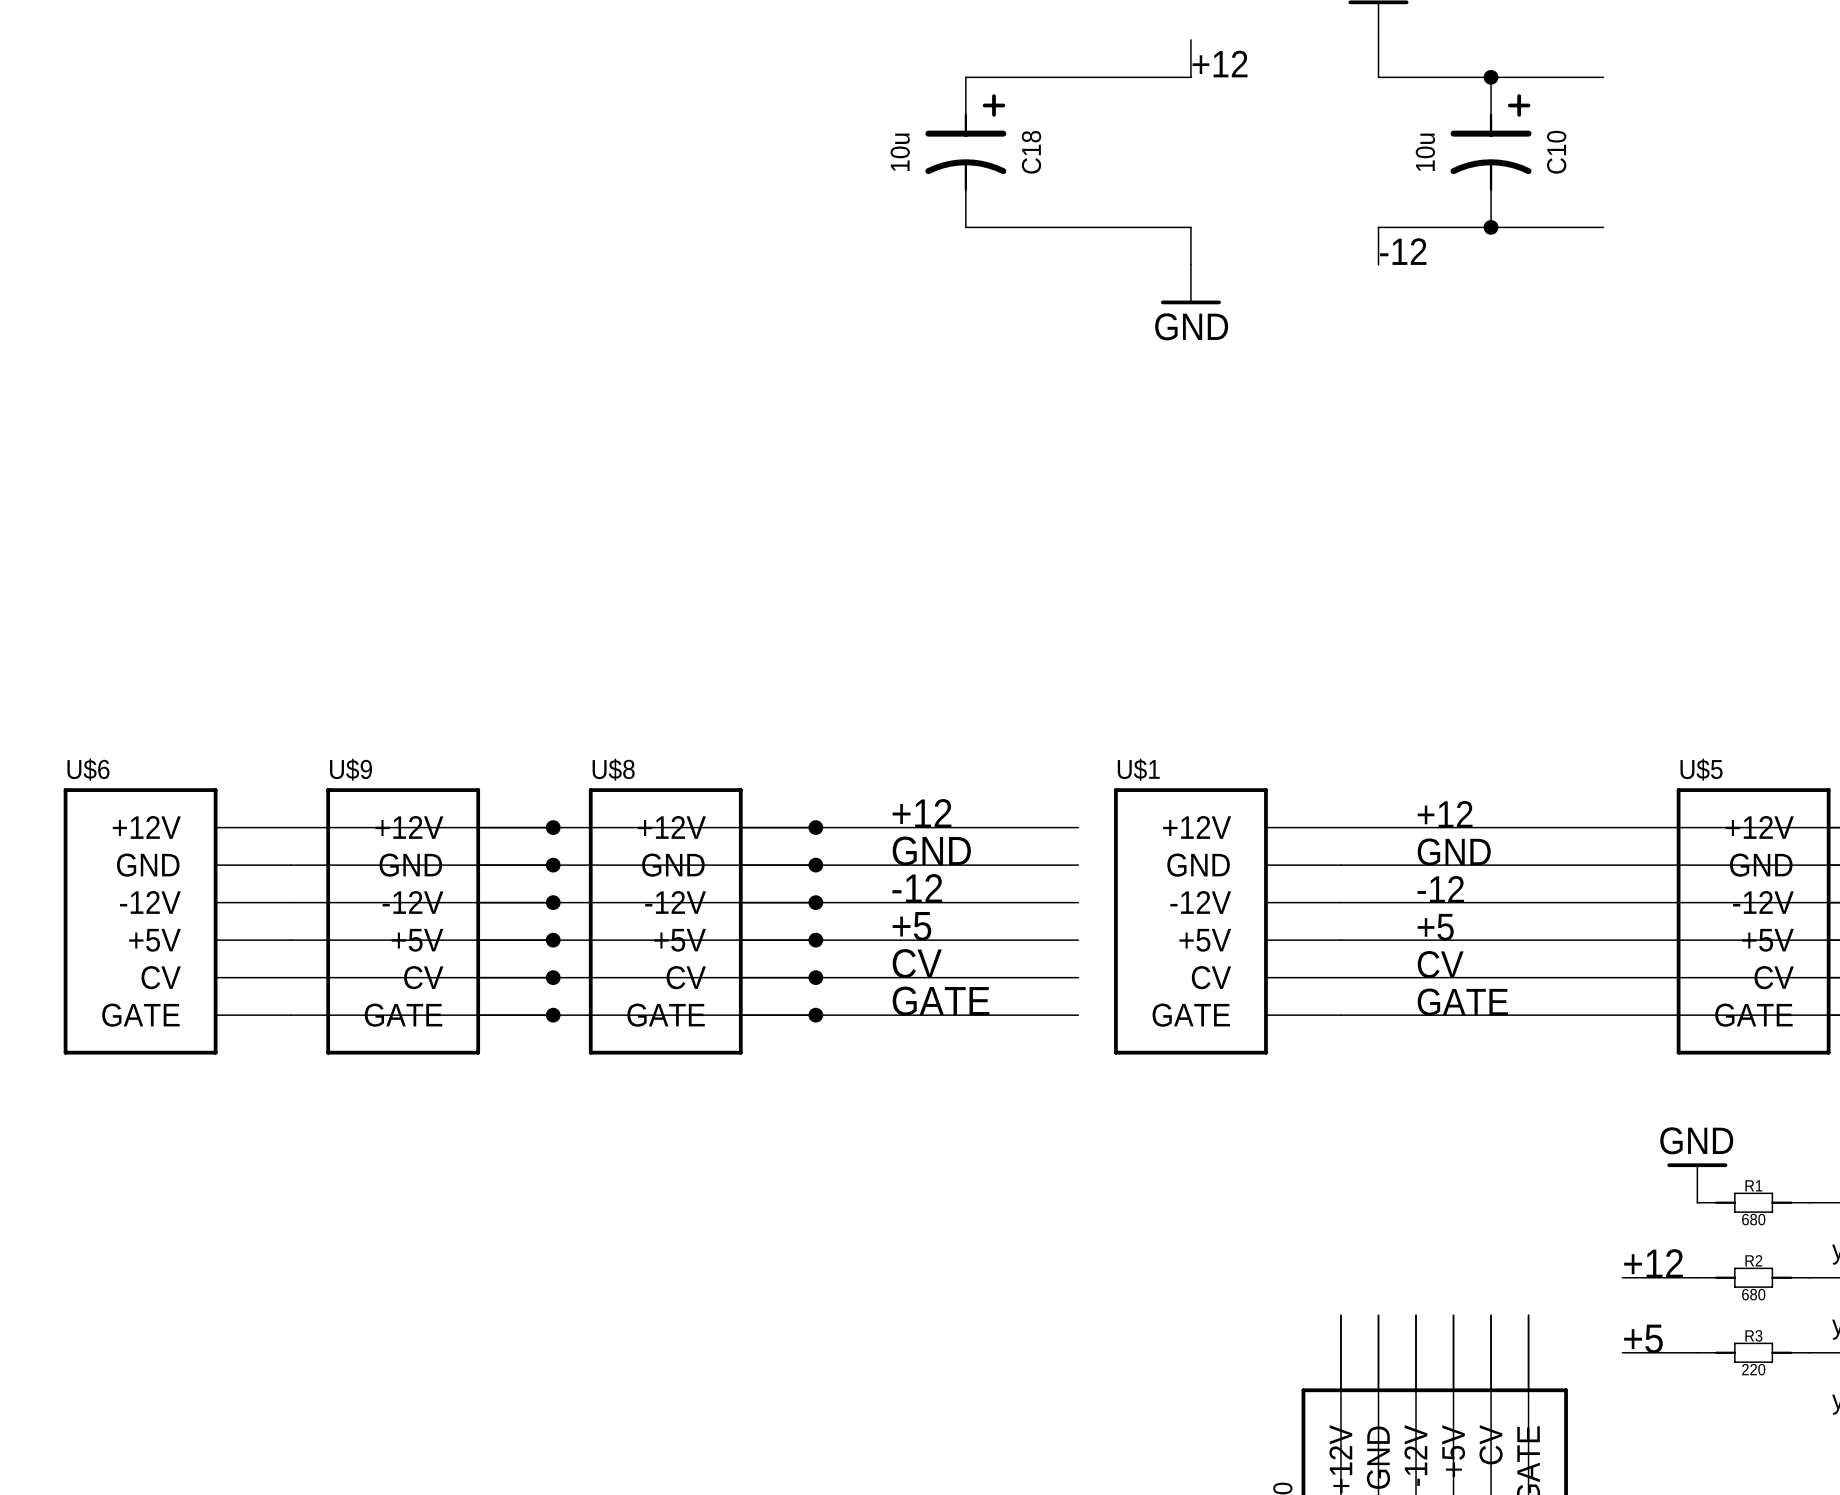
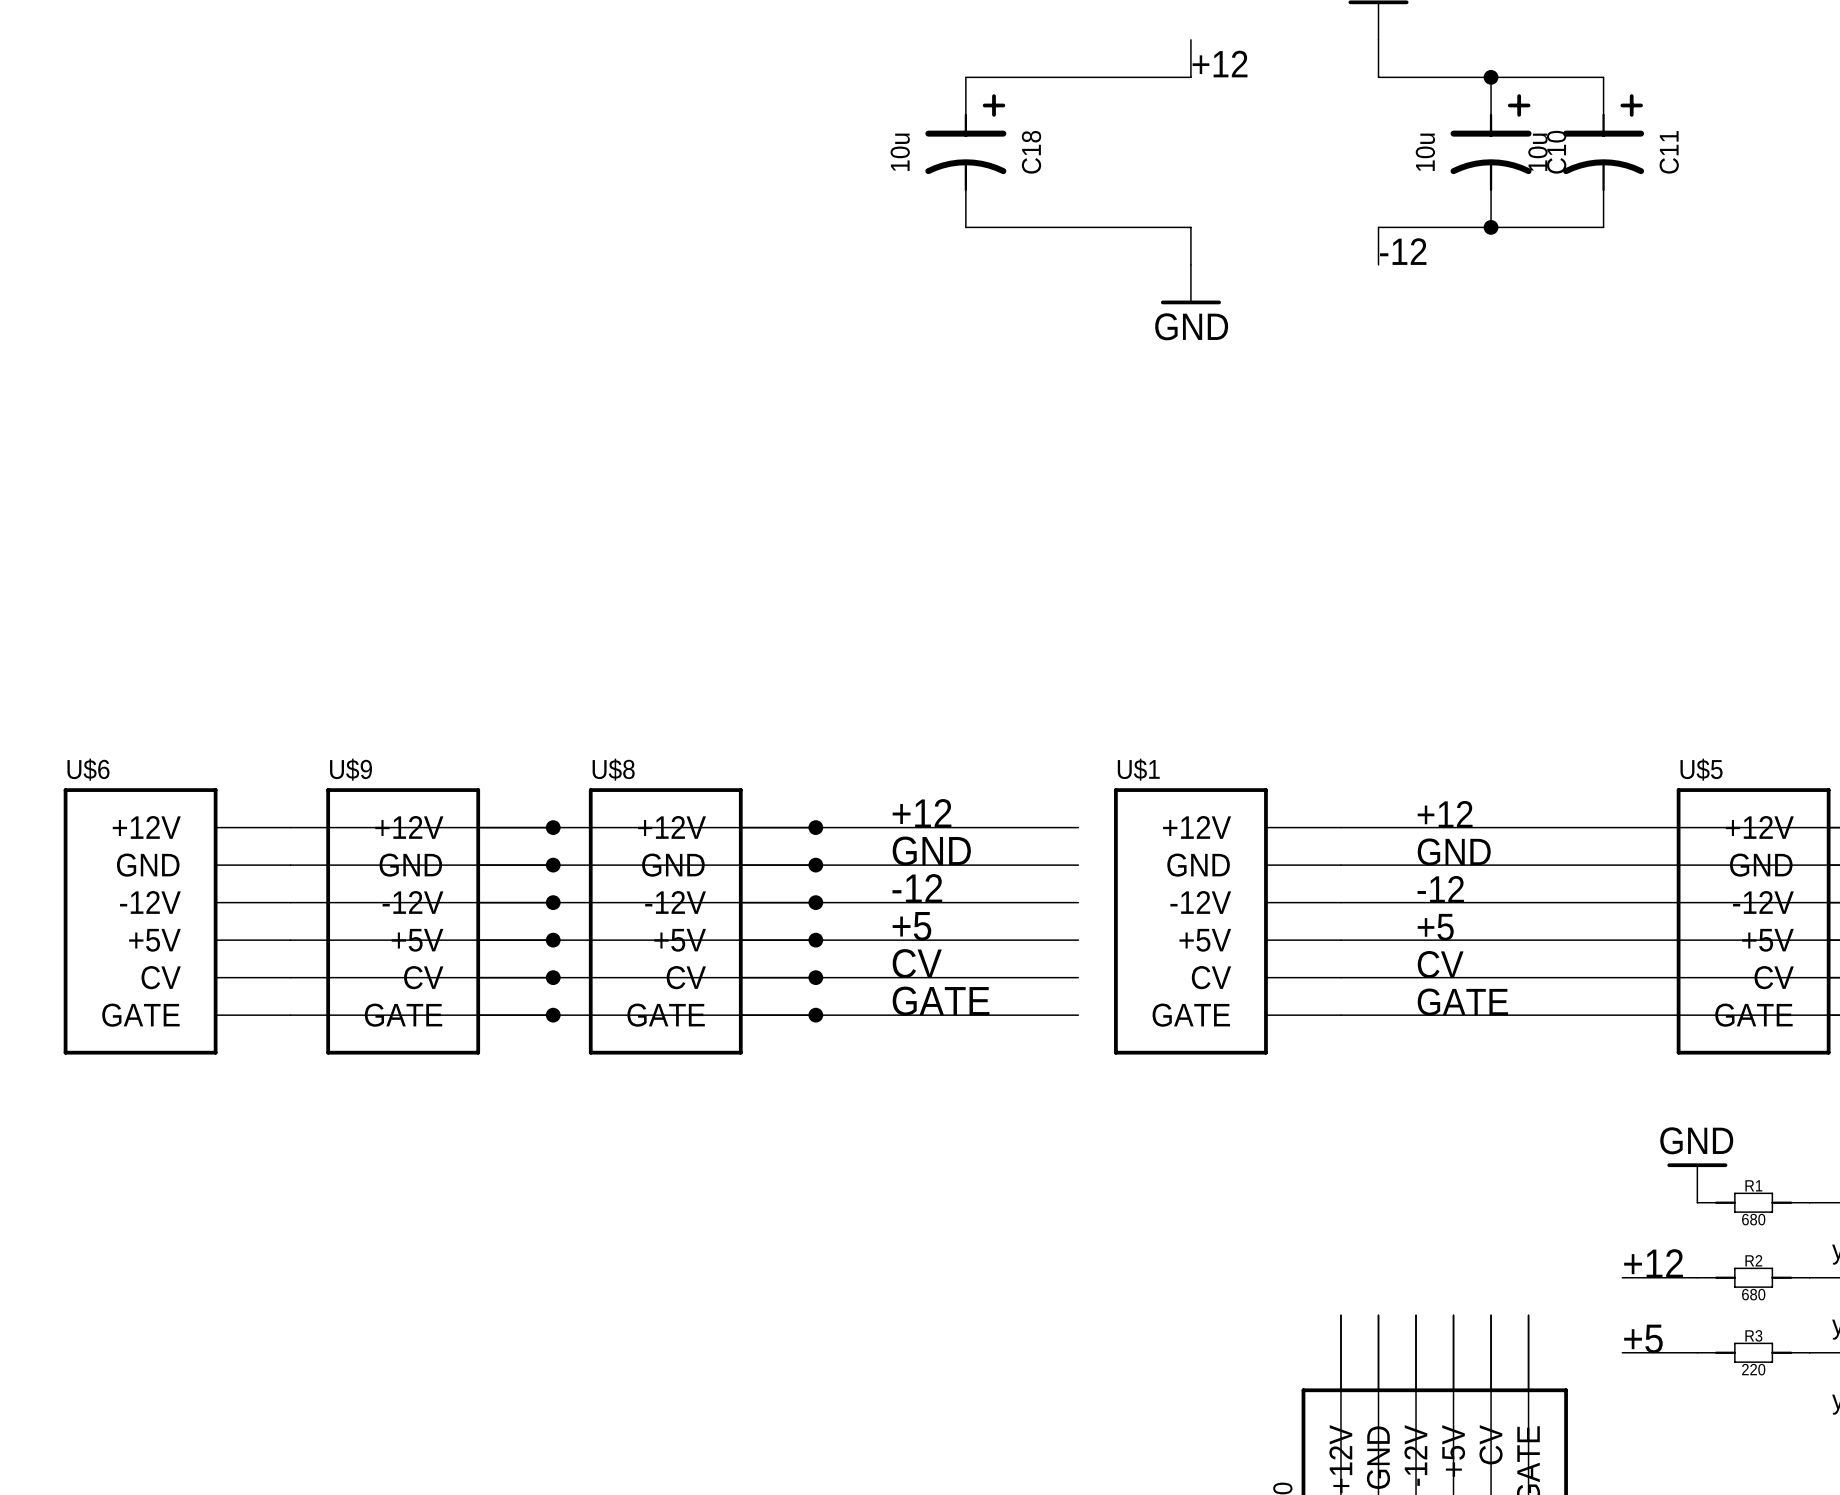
C11: none -> 10u (1603, 152)

